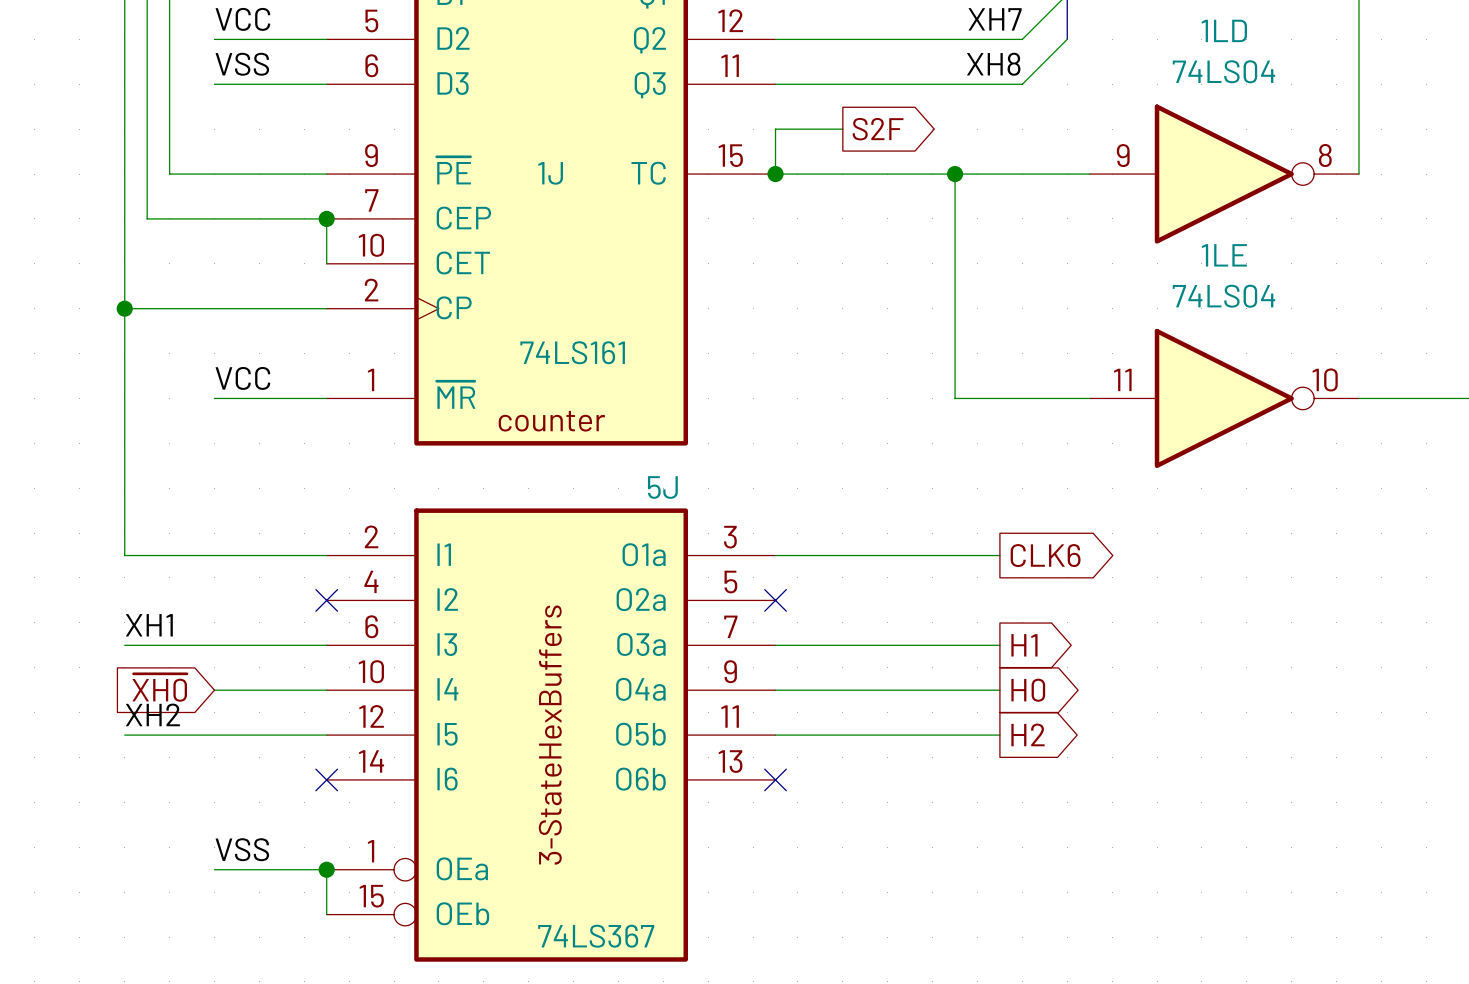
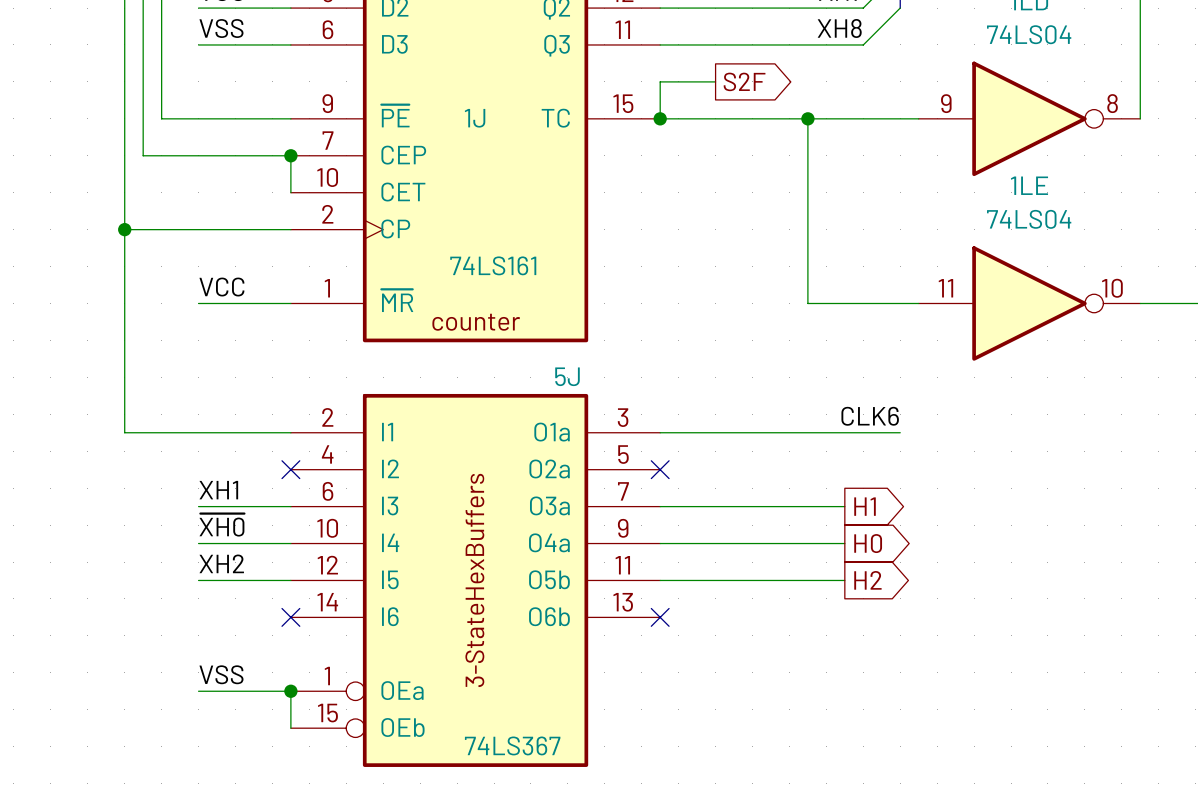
label: none -> CLK6 (870, 416)
wire: none -> (844, 432) (900, 432)
global label: CLK6 (1045, 555) -> none
label position: XH1 (149, 625) -> XH1 (218, 490)
wire: (124, 645) (214, 645) -> none
label: none -> ~{XH0} (221, 525)
global label: ~{XH0} (159, 687) -> none
label position: XH2 (152, 714) -> XH2 (221, 563)
wire: (124, 735) (214, 735) -> none

